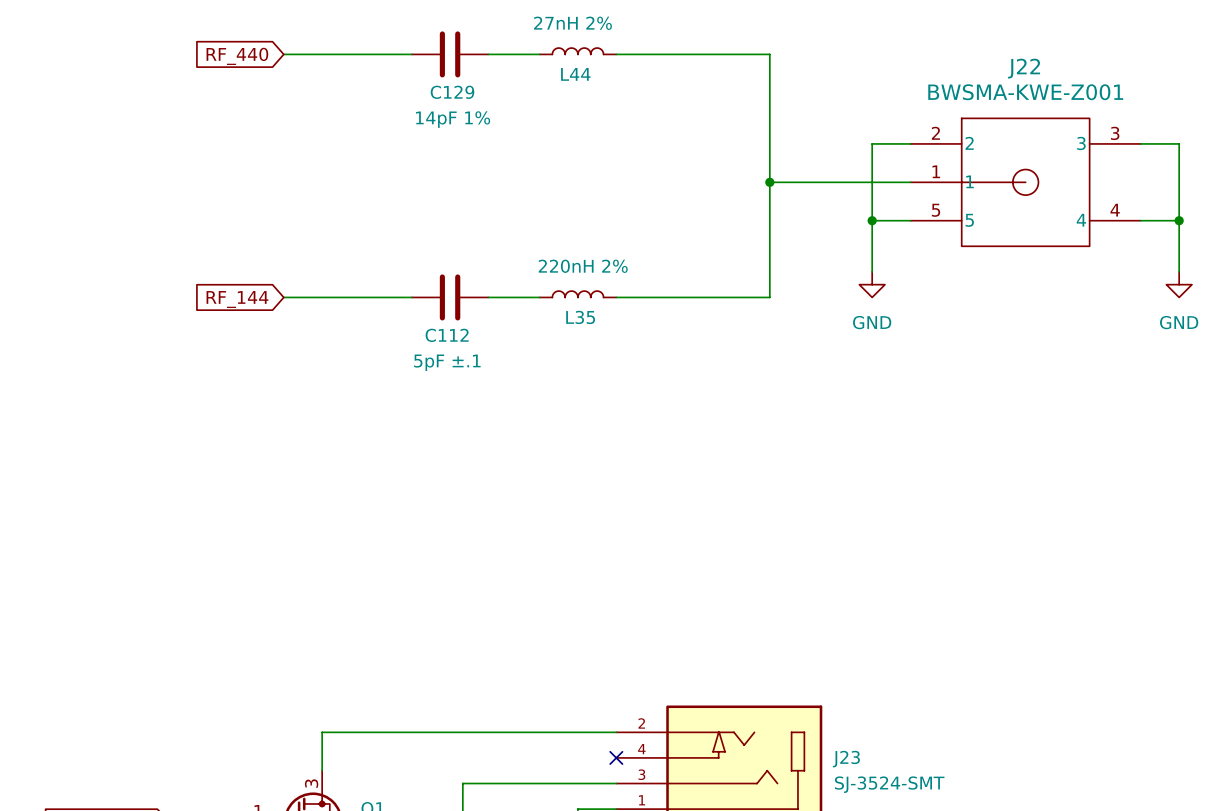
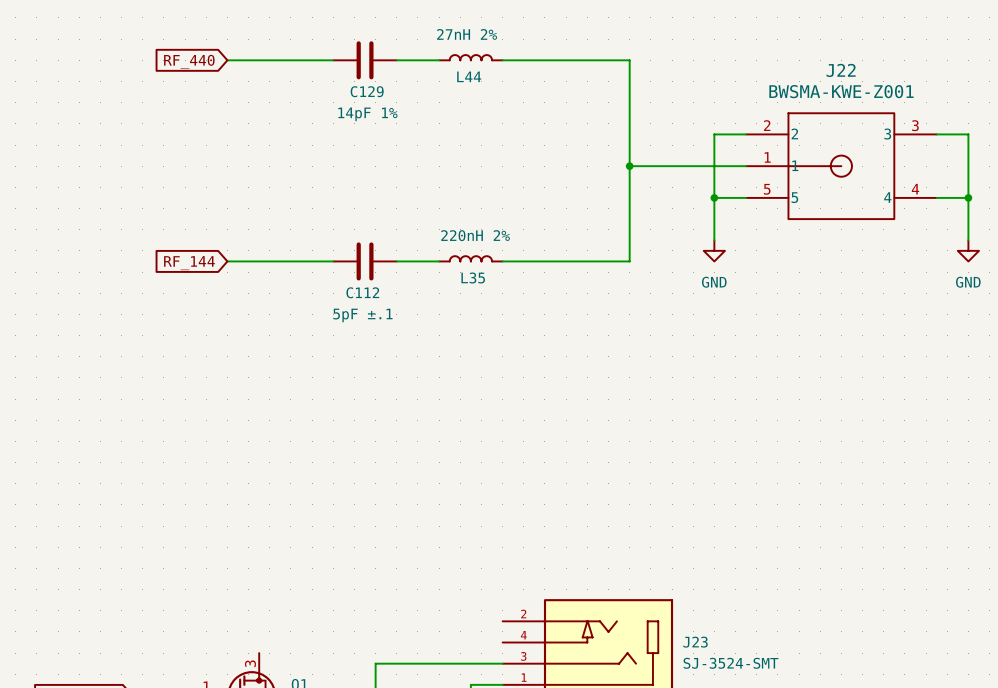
wire: (616, 732) (322, 732) (322, 770) -> none
no-connect mark: (616, 757) -> none

